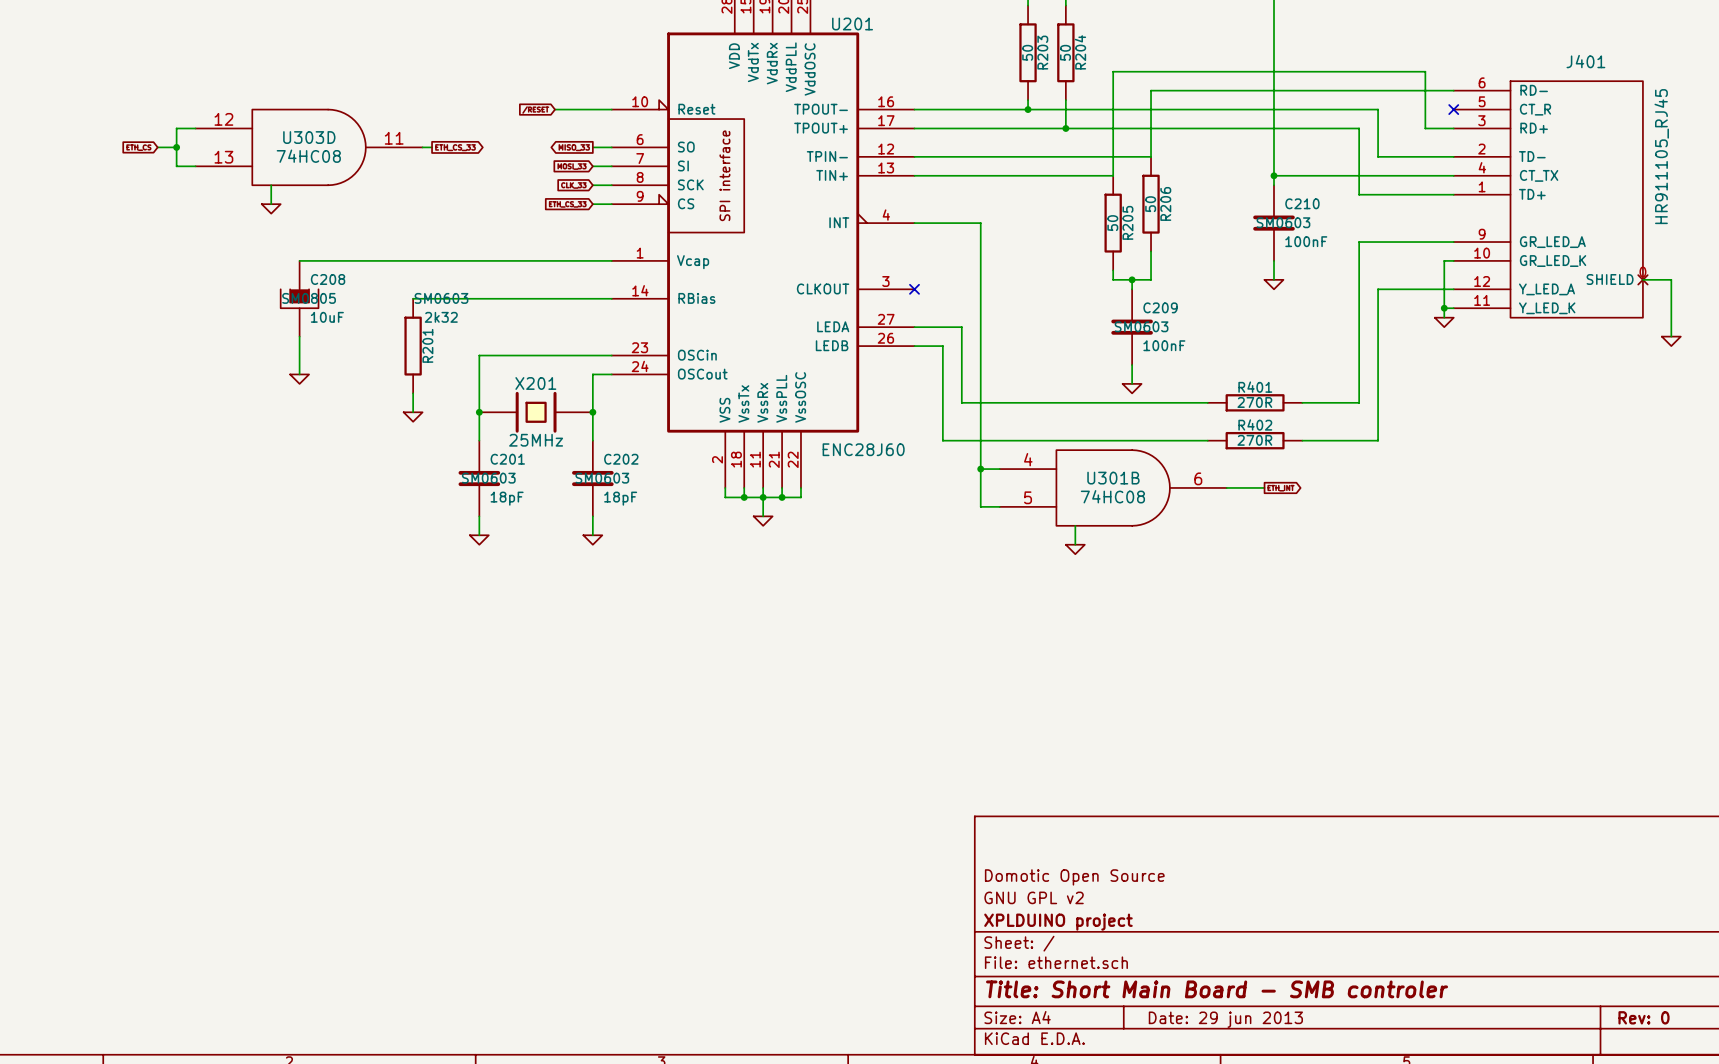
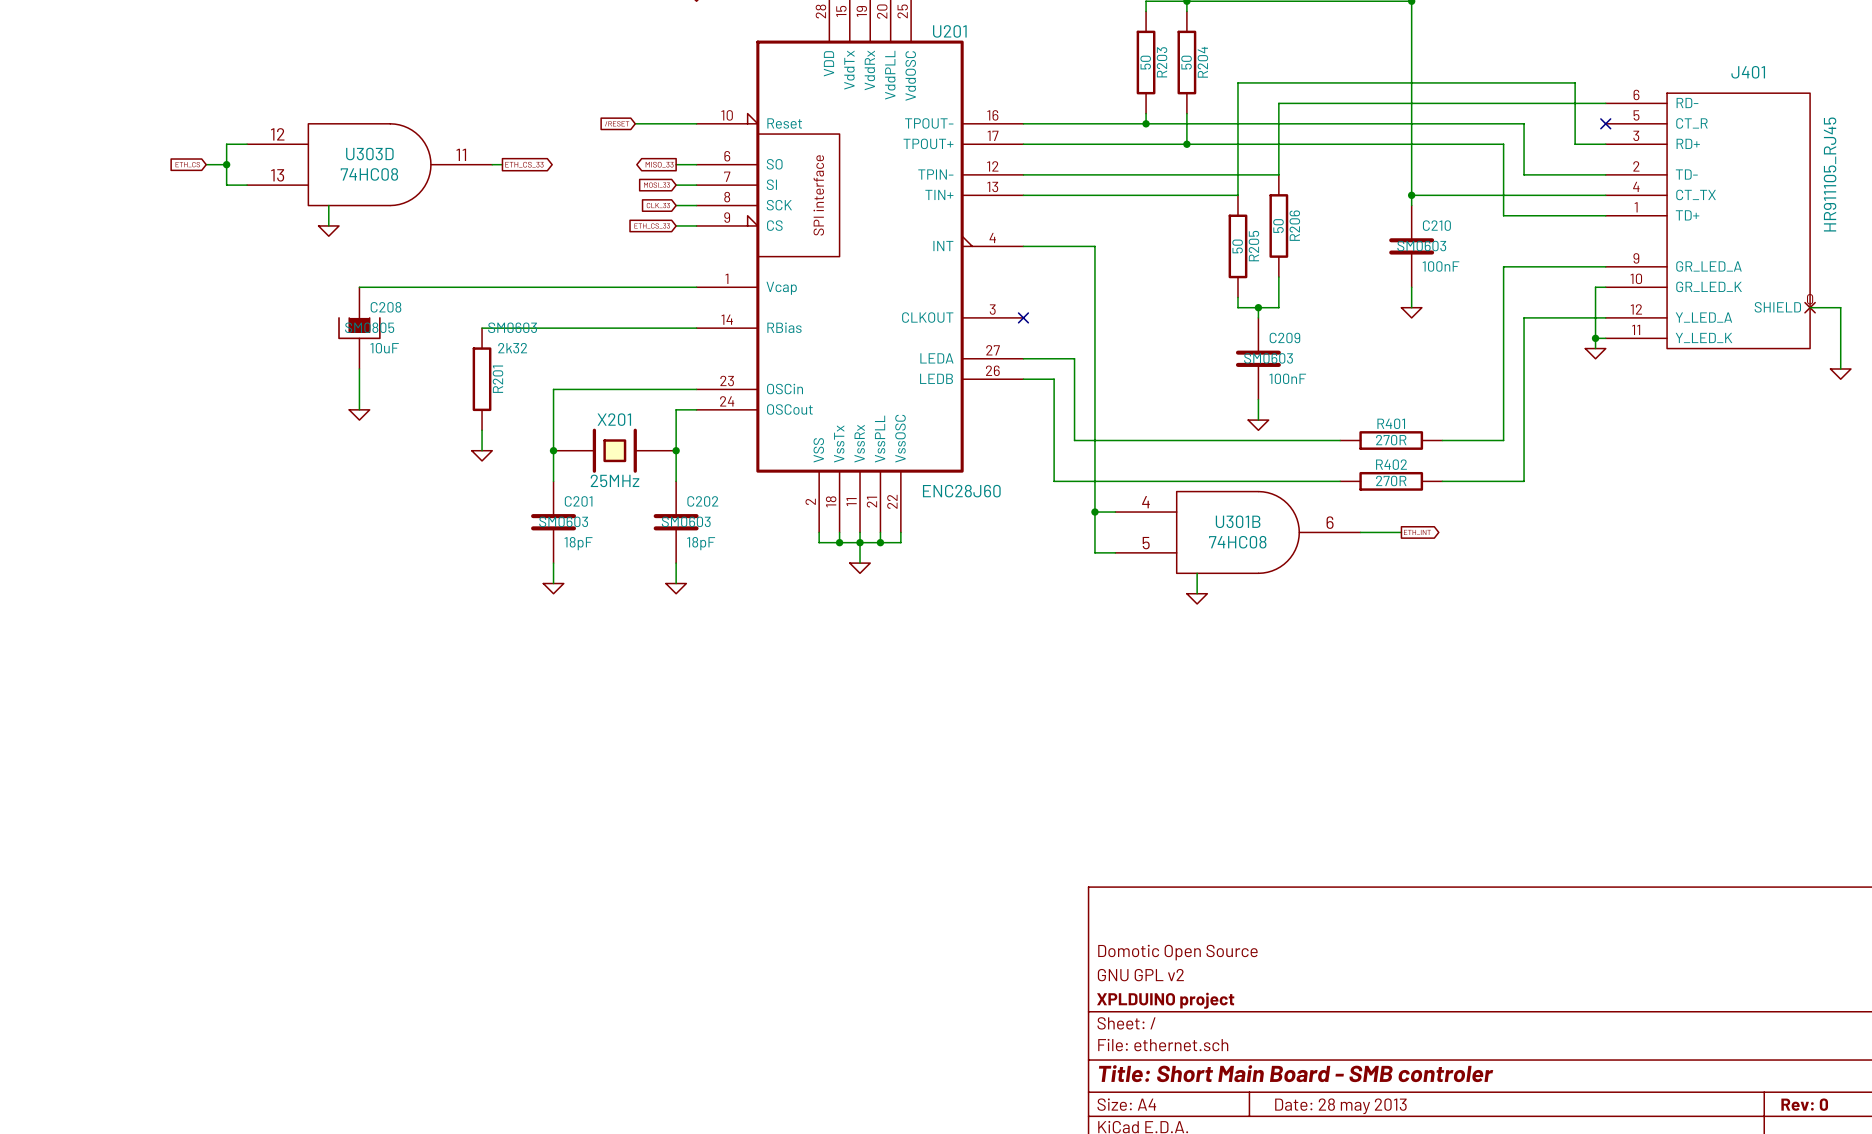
title block: Date: 29 jun 2013 (1225, 1019) -> Date: 28 may 2013 (1340, 1106)

